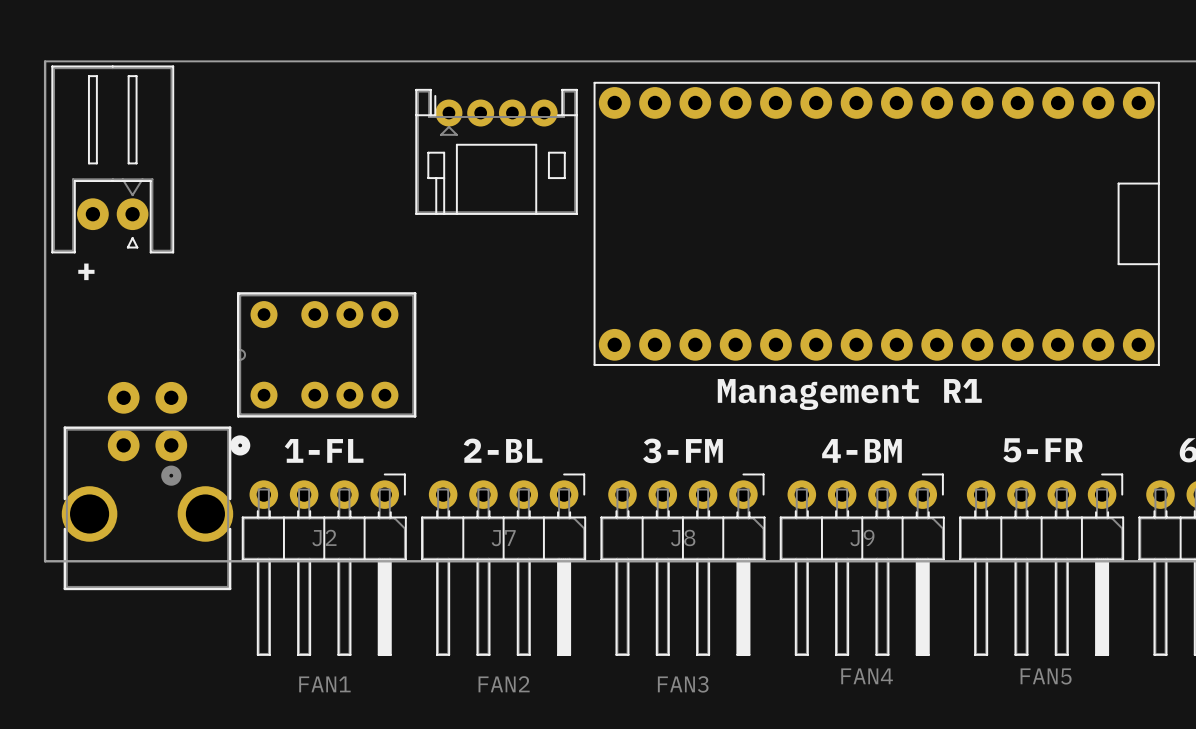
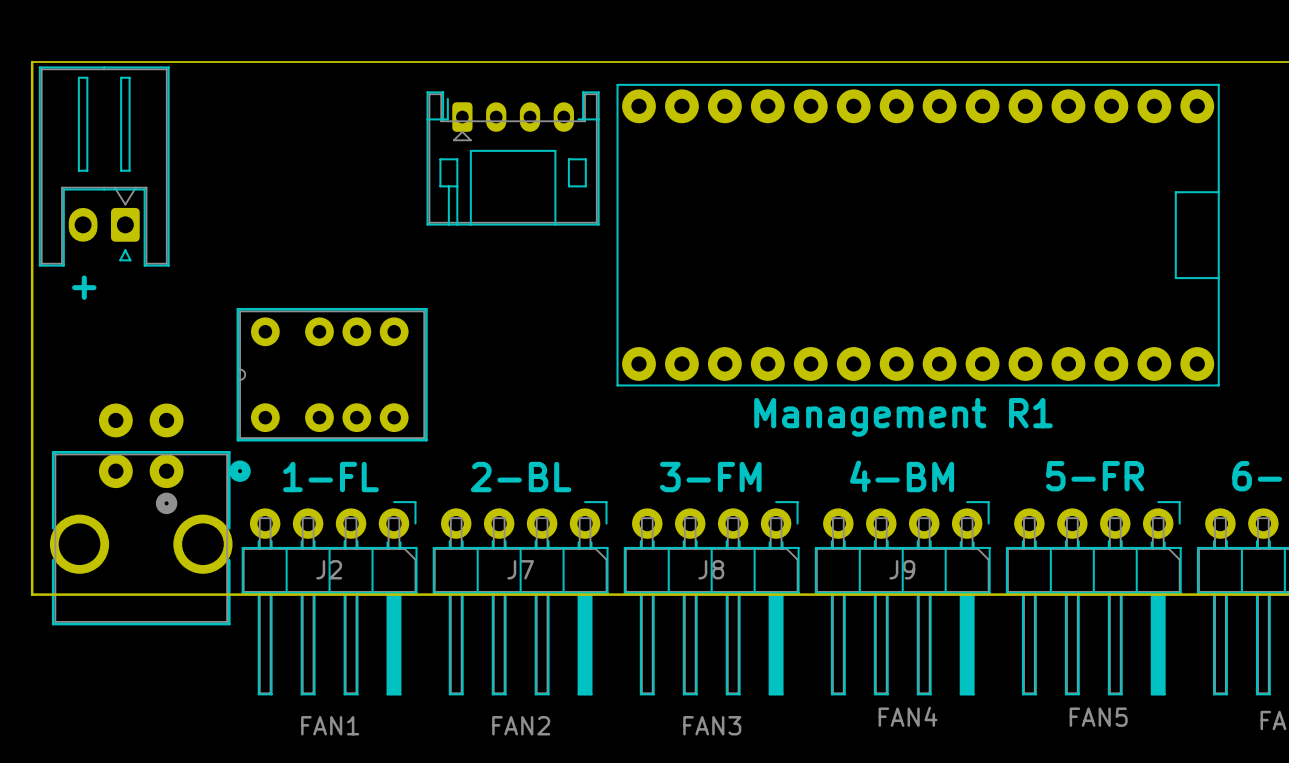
part footprint: [51, 65, 175, 254] -> [38, 66, 170, 267]
part footprint: [415, 88, 578, 215] -> [426, 91, 600, 226]

